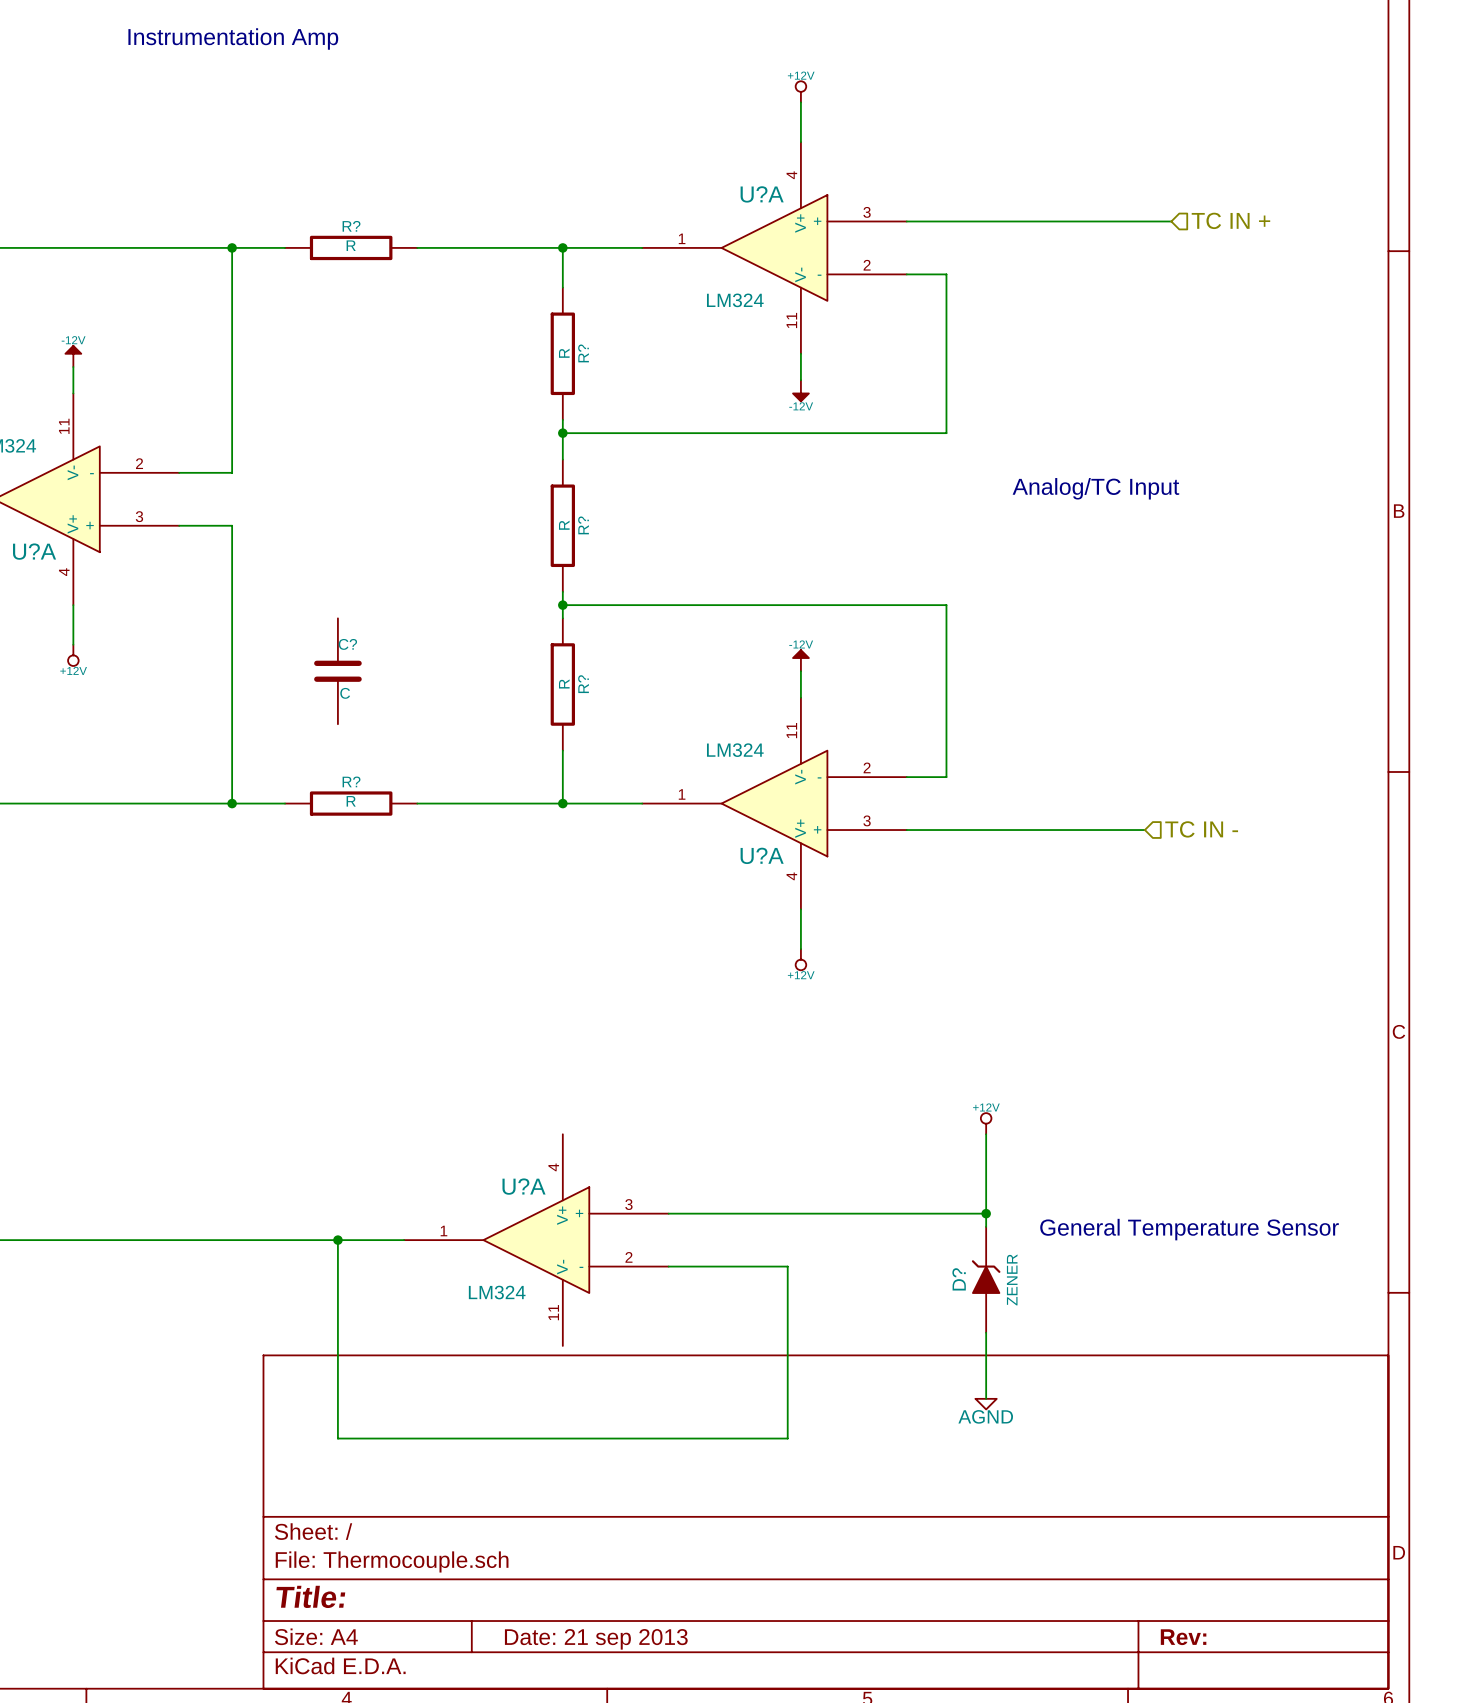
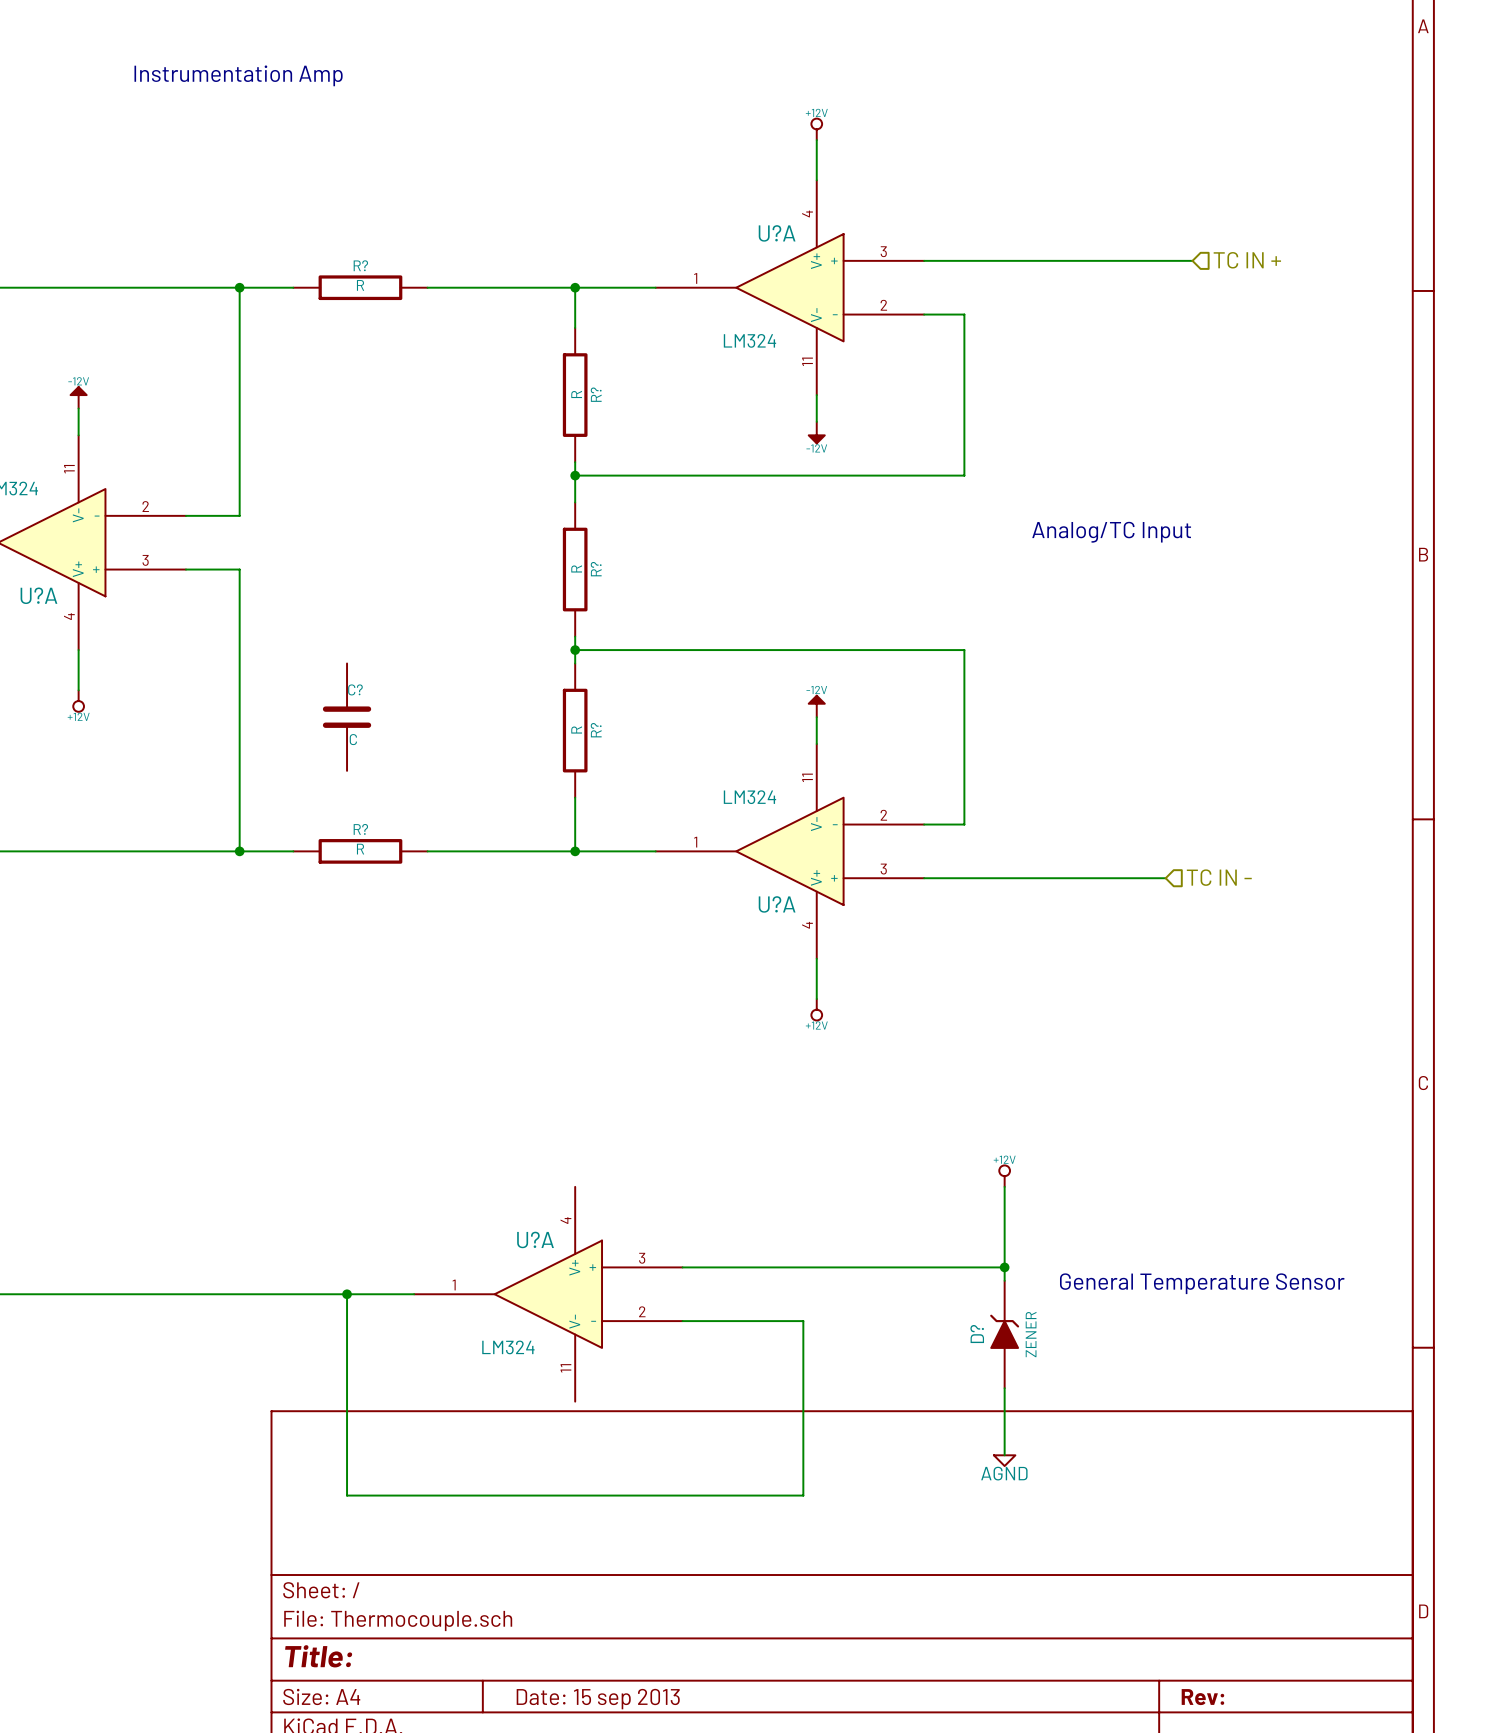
title block: Date: 21 sep 2013 (596, 1639) -> Date: 15 sep 2013 (598, 1699)

